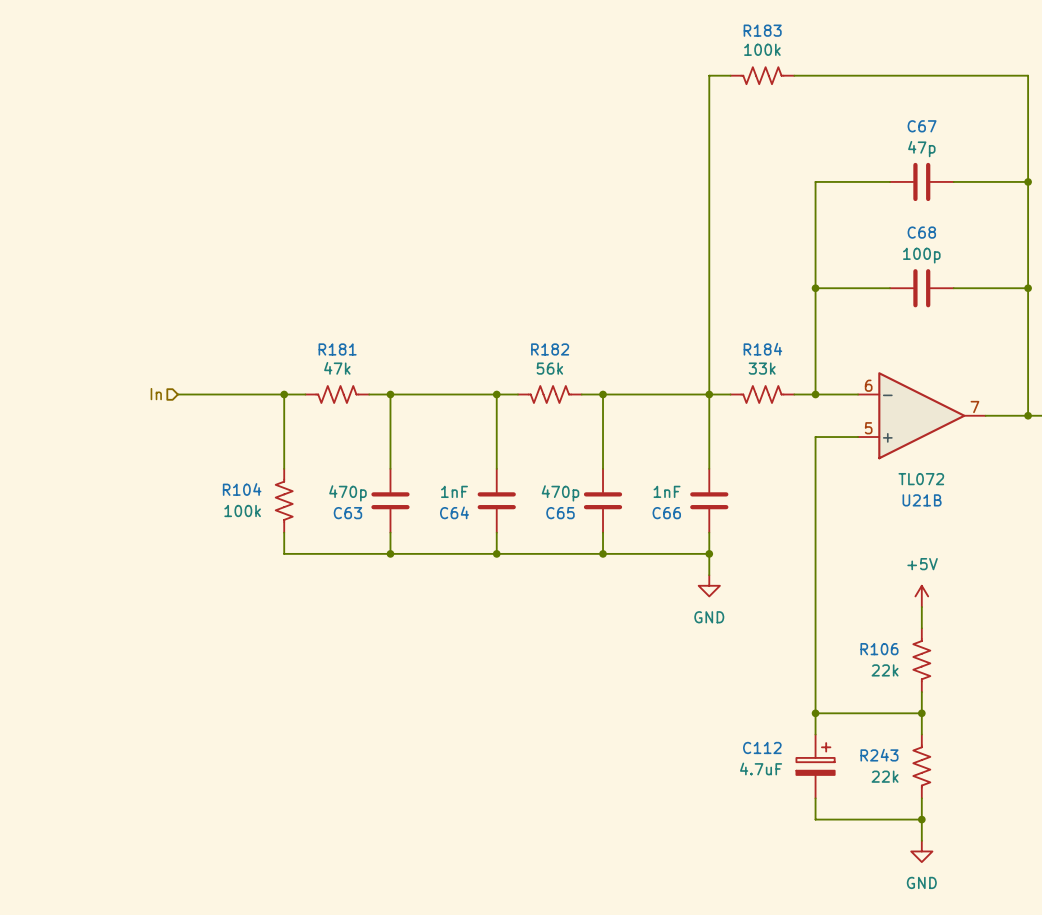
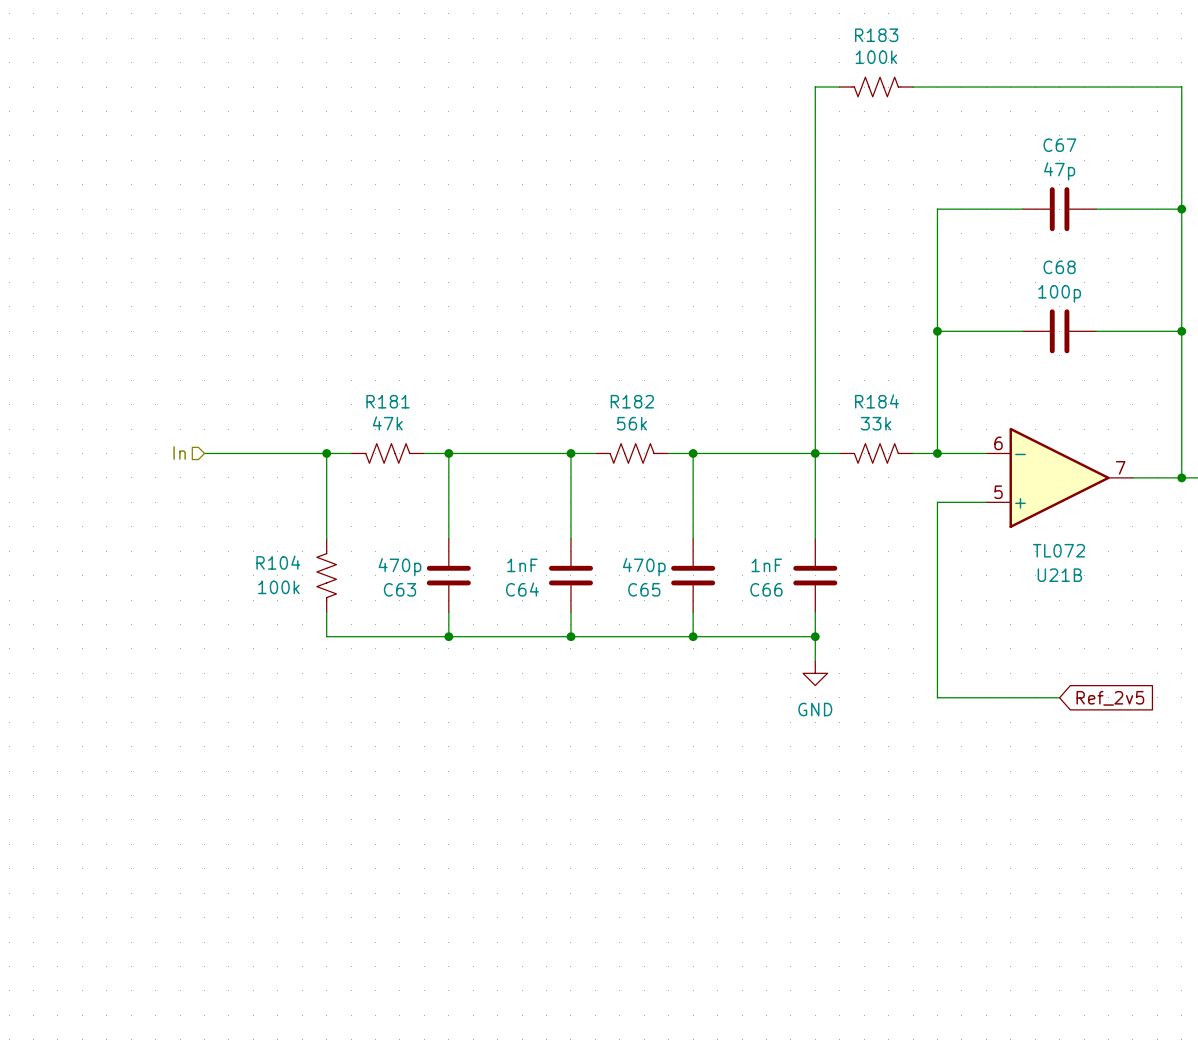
power symbol: +5V (921, 596) -> none
wire: (815, 607) (815, 734) -> none
wire: (921, 607) (921, 628) -> (1059, 697) (937, 697)
global label: none -> Ref_2v5 (1110, 698)
R106: 22k (921, 660) -> none
wire: (921, 692) (921, 734) -> none
wire: (815, 713) (921, 713) -> none
junction: (815, 713) -> none
junction: (921, 713) -> none
C112: 4.7uF (815, 766) -> none
R243: 22k (921, 766) -> none
wire: (815, 798) (815, 819) (921, 819) -> none
wire: (921, 798) (921, 840) -> none
junction: (921, 819) -> none
power symbol: GND (921, 851) -> none

